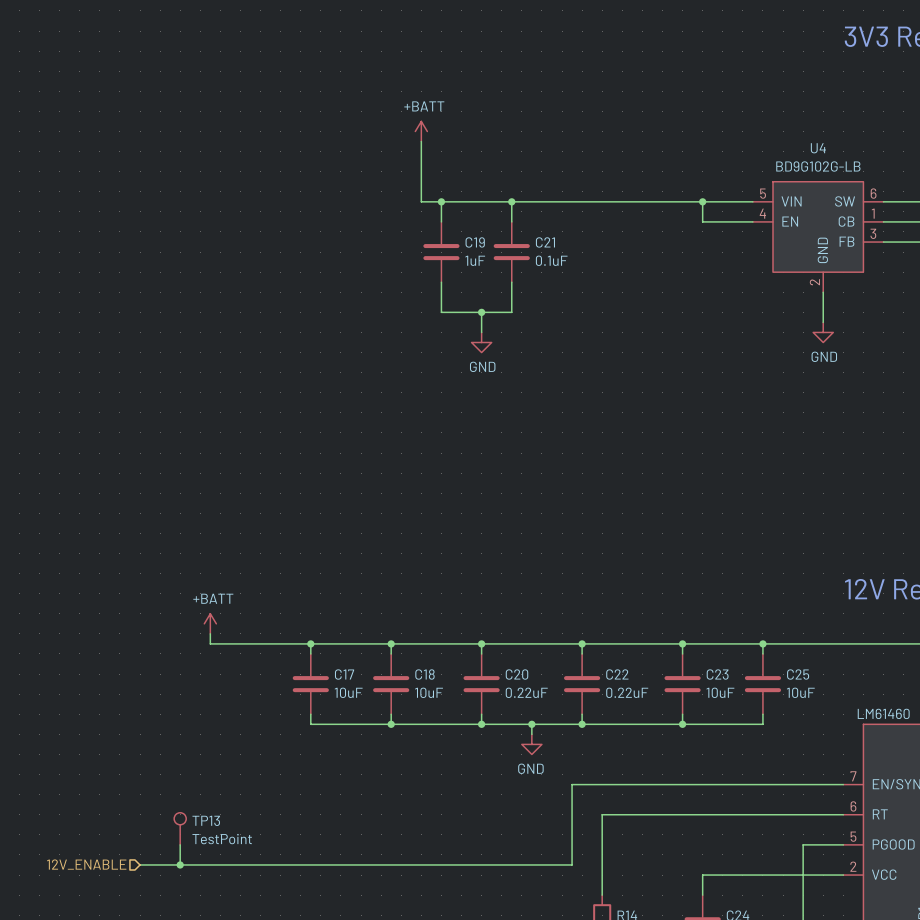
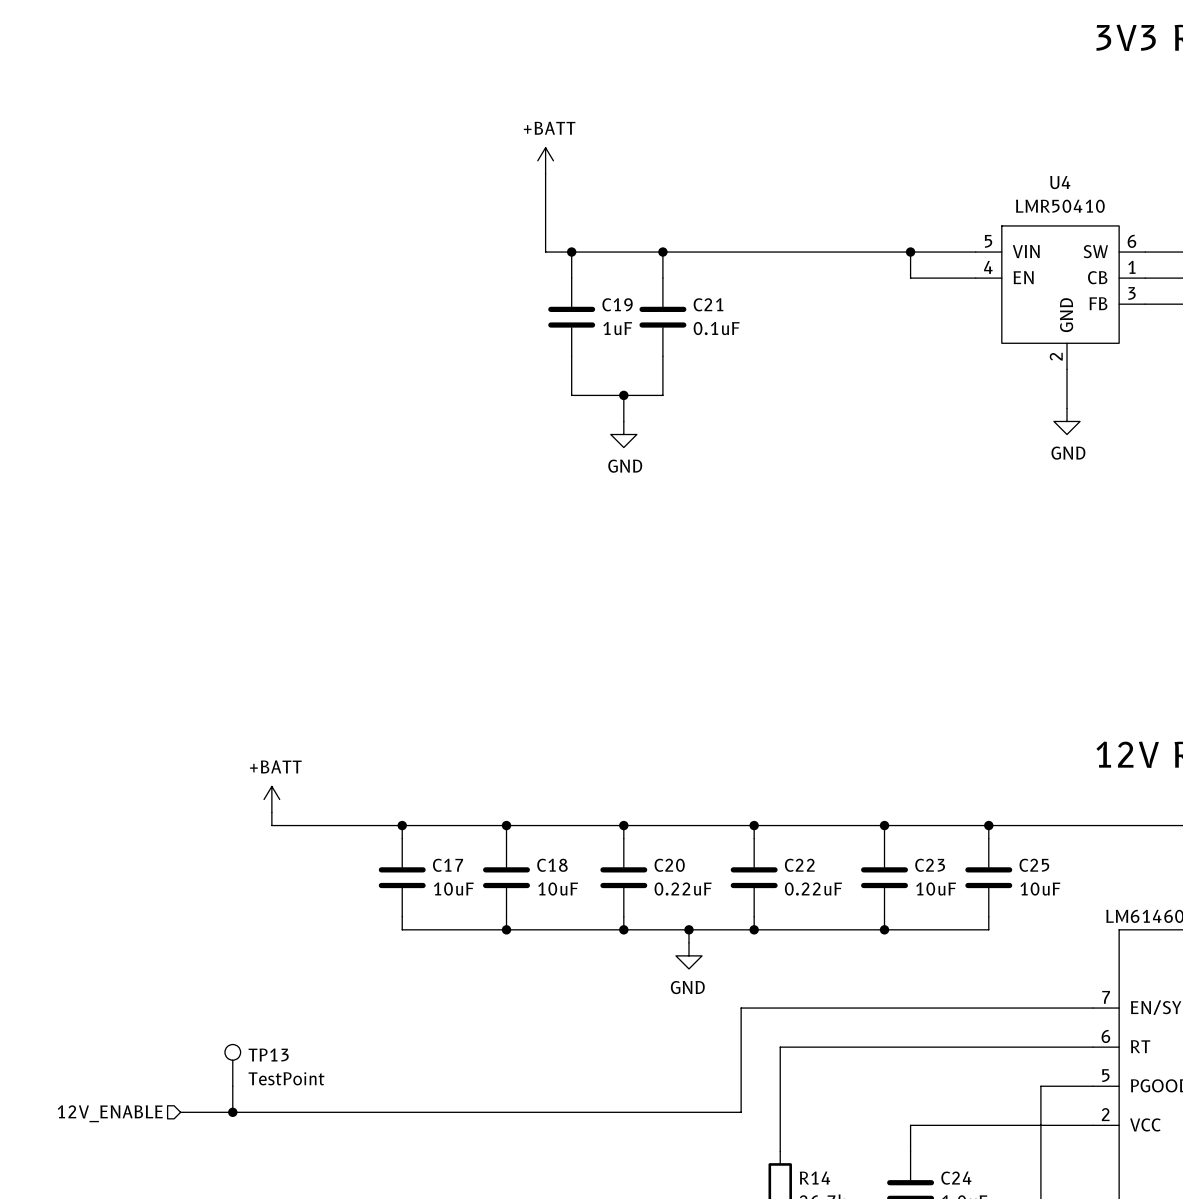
U4 value: BD9G102G-LB (818, 166) -> LMR50410 (1060, 206)

